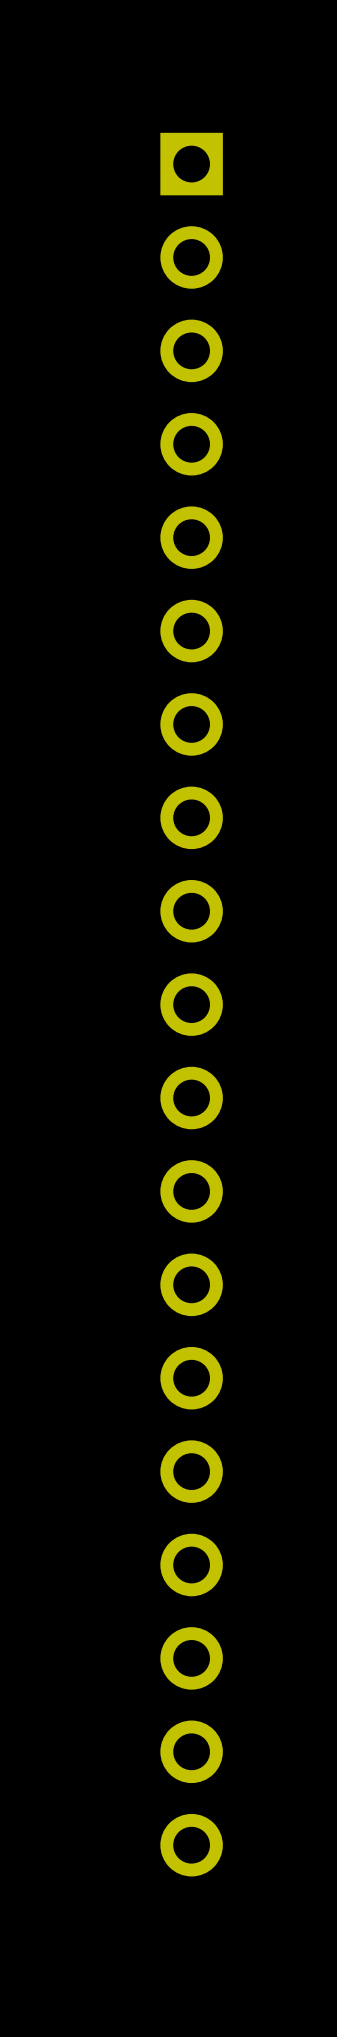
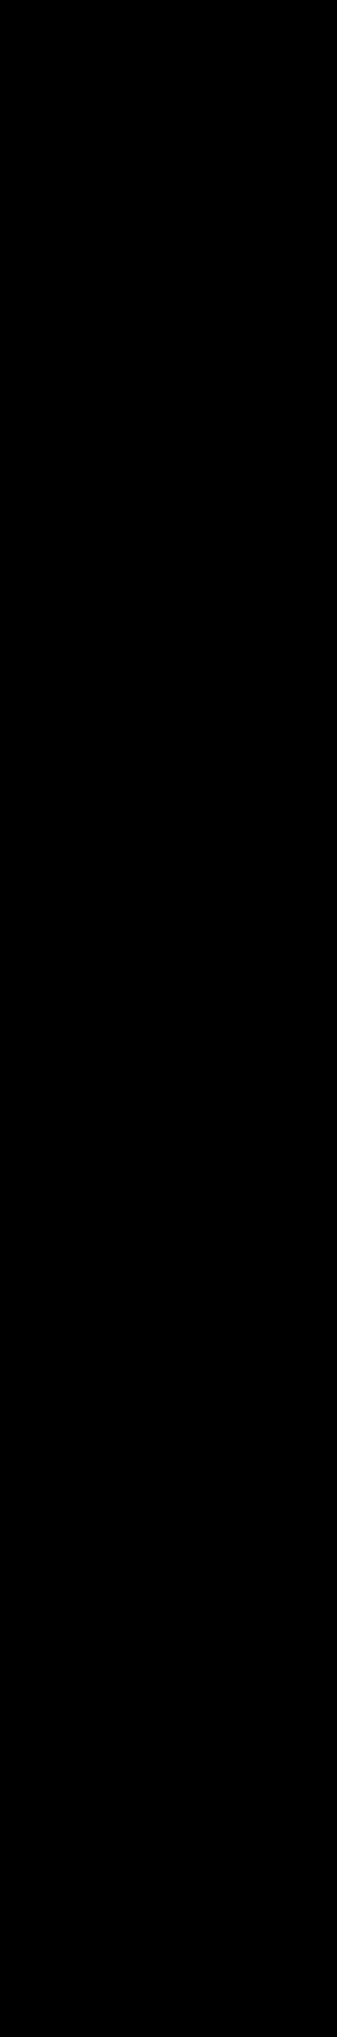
part: (191, 1004) -> none

